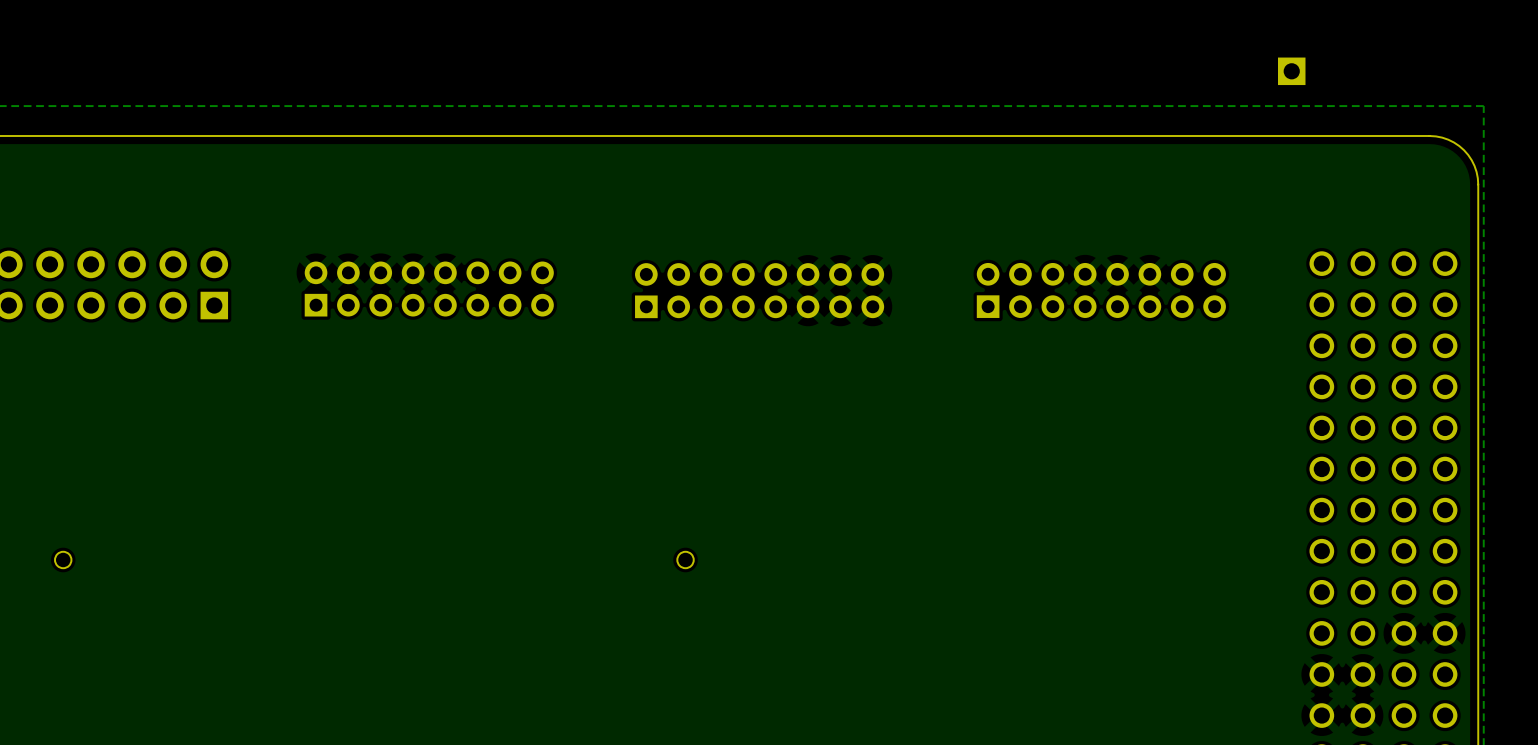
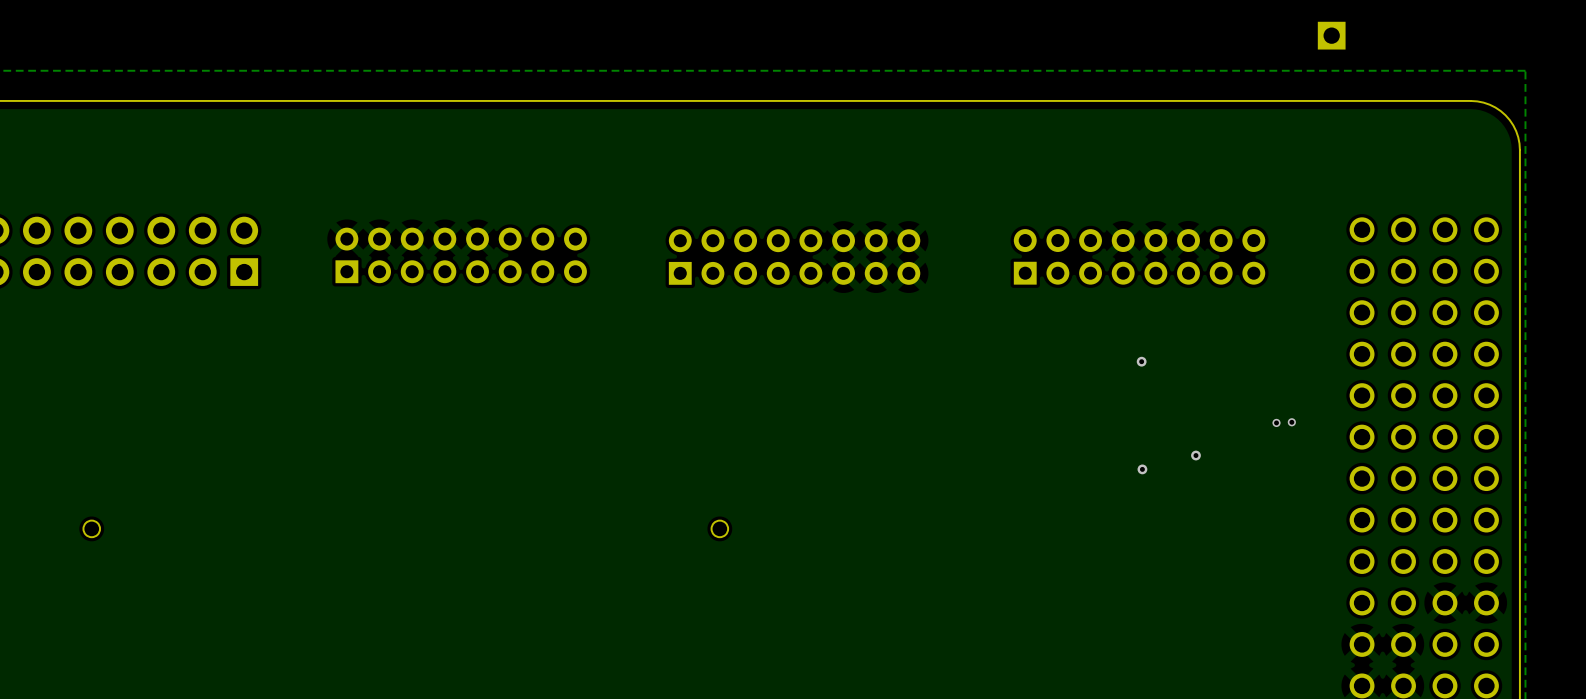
via: none -> (1141, 361)
via: none -> (1291, 422)
via: none -> (1276, 422)
via: none -> (1195, 455)
via: none -> (1142, 469)

